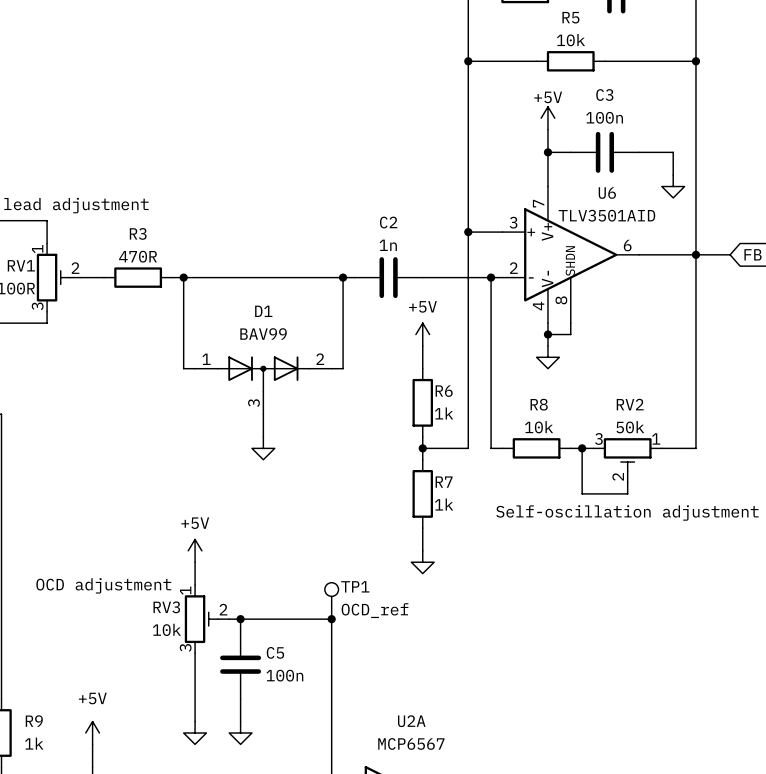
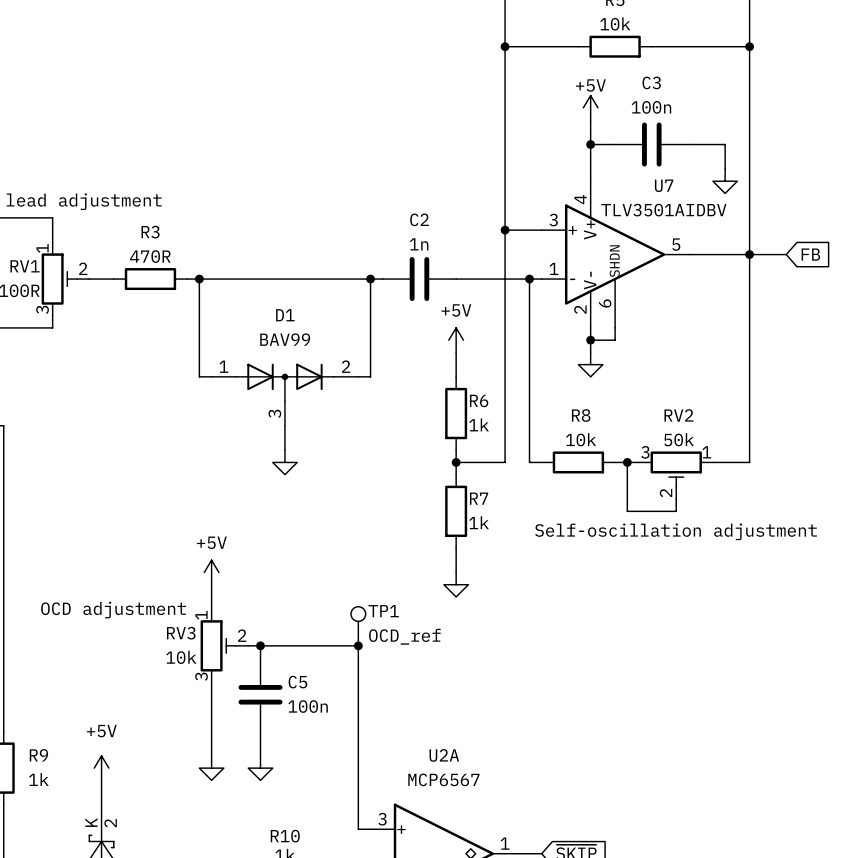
U6 name: U6 (607, 193) -> U7 (664, 185)
U6 pin number: 7 (538, 203) -> 4 (580, 199)
U6 value: TLV3501AID (606, 215) -> TLV3501AIDBV (663, 210)
U6 pin number: 6 (627, 245) -> 5 (676, 244)
U6 pin number: 2 (513, 268) -> 1 (554, 268)
U6 pin number: 8 (561, 300) -> 6 (605, 303)
U6 pin number: 4 (538, 306) -> 2 (580, 309)

